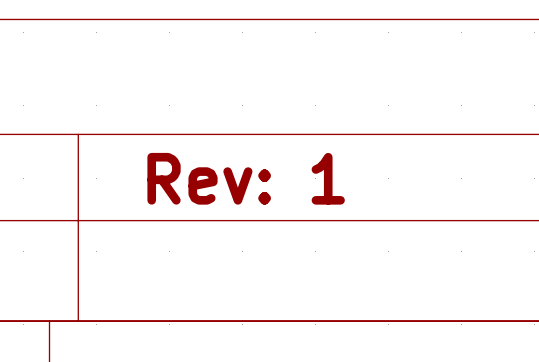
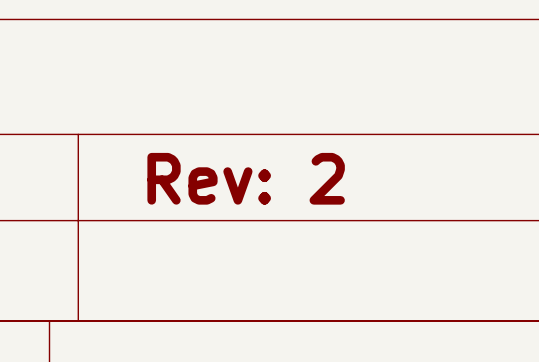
title block: Rev: 1 (246, 178) -> Rev: 2 (246, 178)

